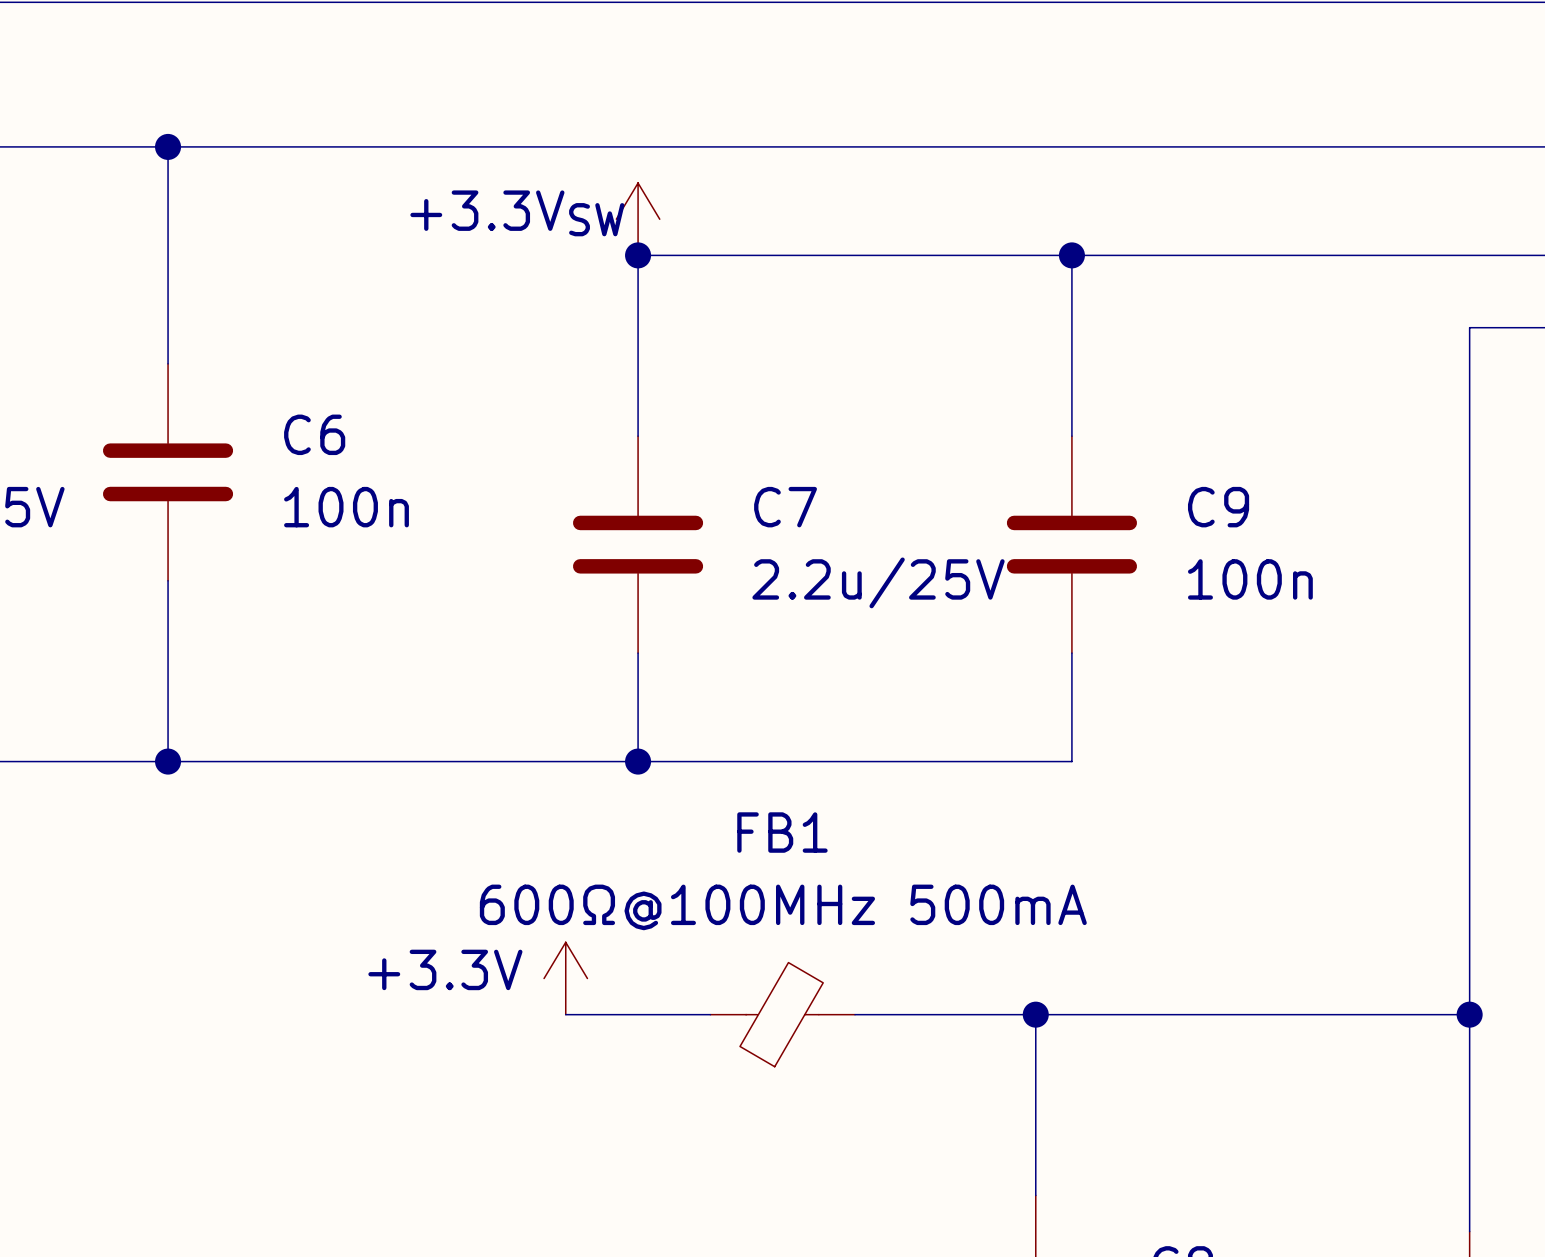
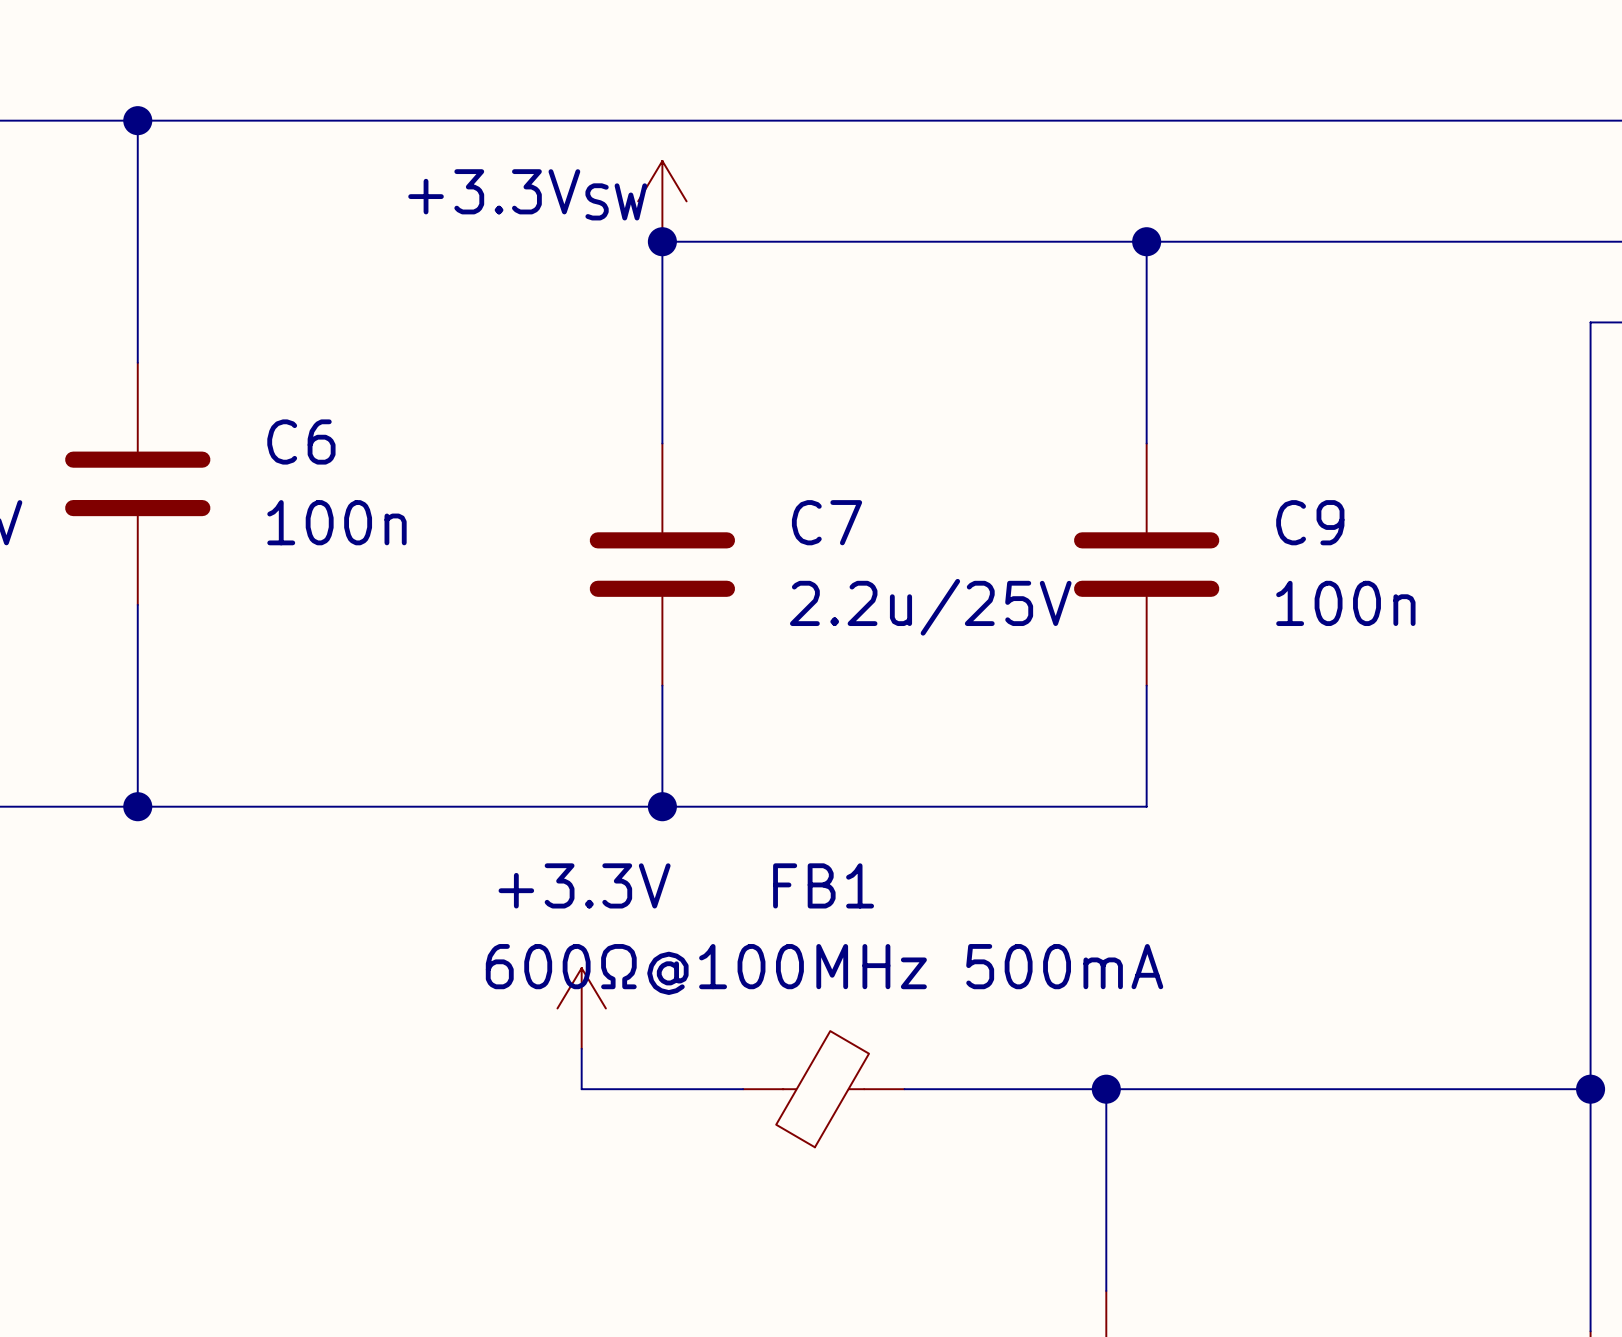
power symbol text position: +3.3V (445, 969) -> +3.3V (584, 885)
power symbol position: +3.3V (565, 978) -> +3.3V (581, 1008)

